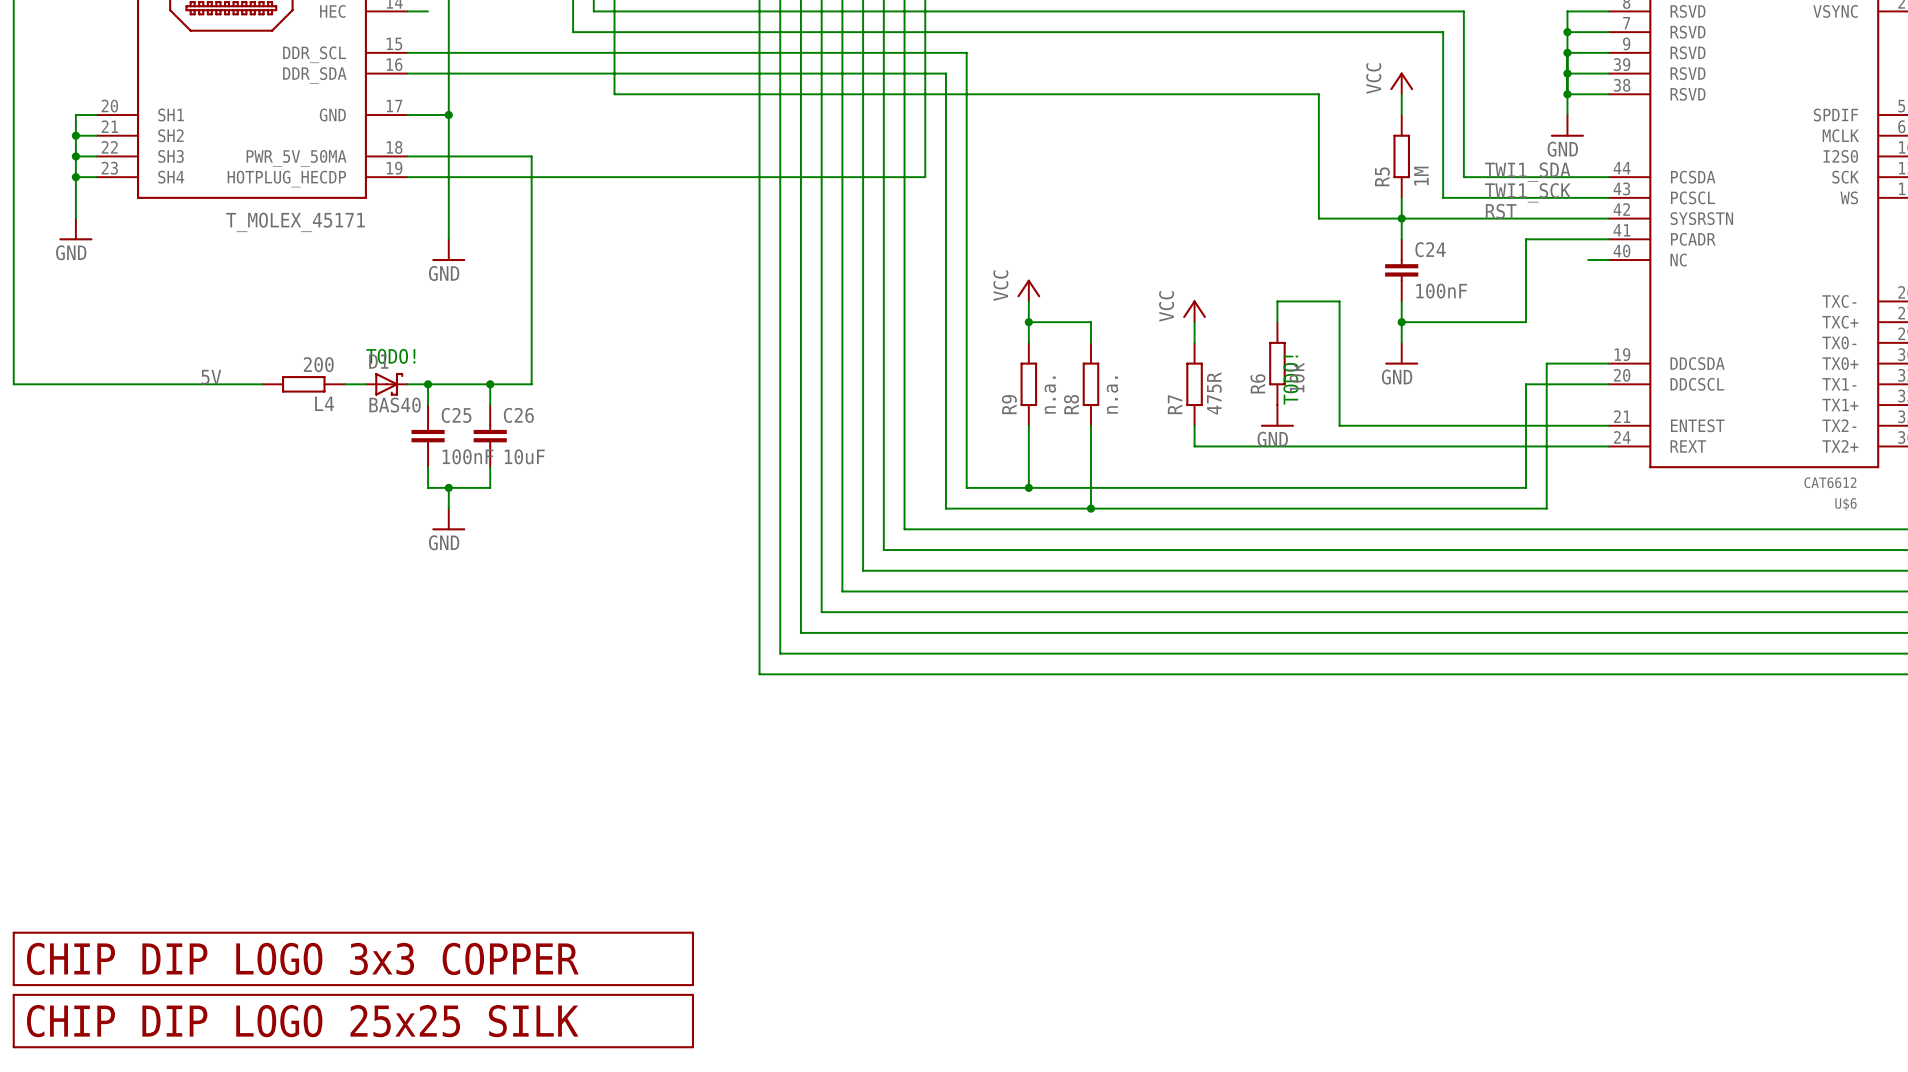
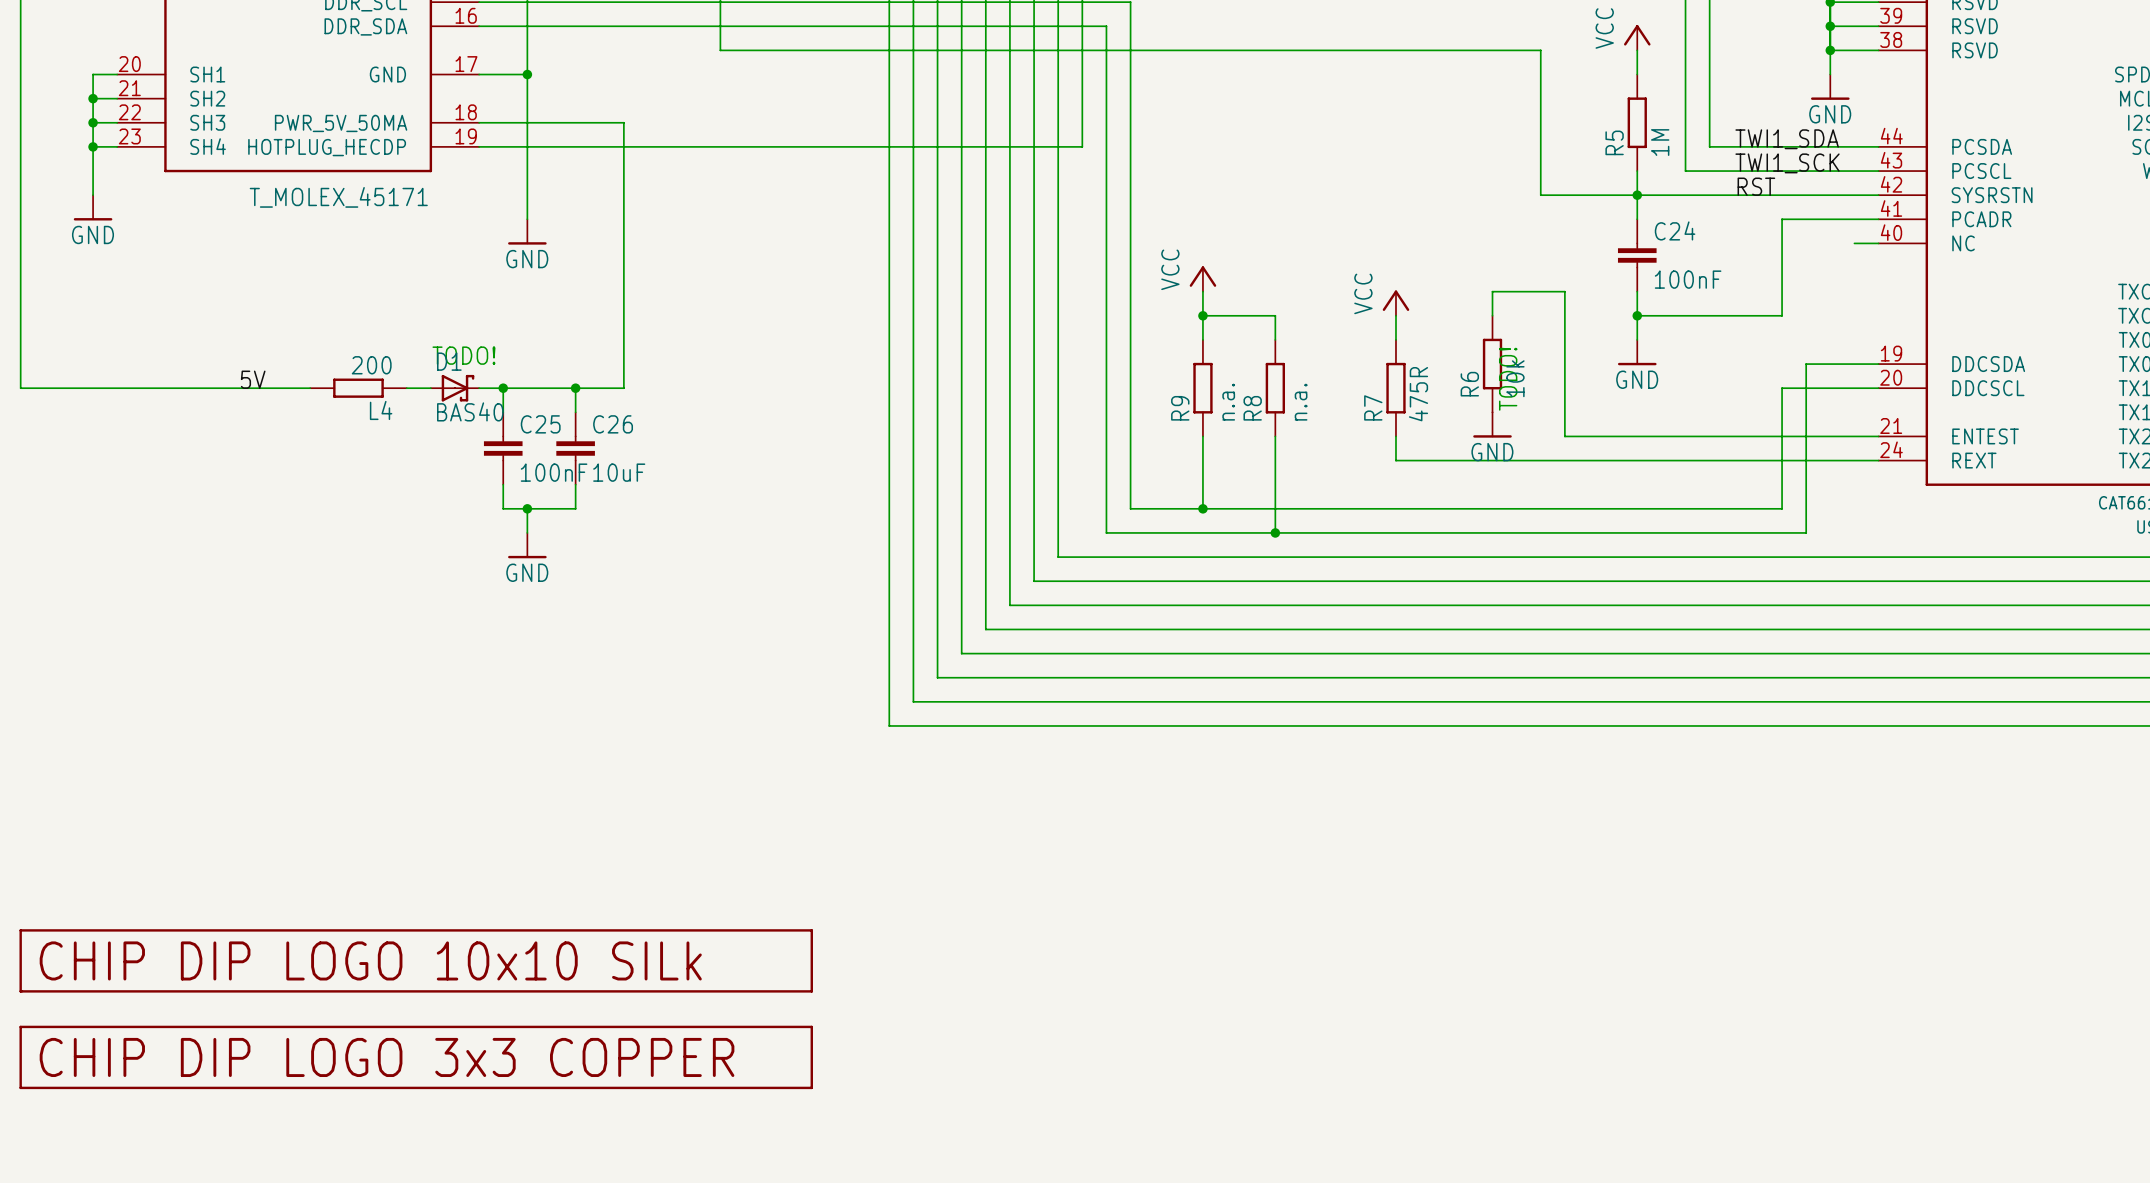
part: none -> (416, 960)
part: (353, 1021) -> none

